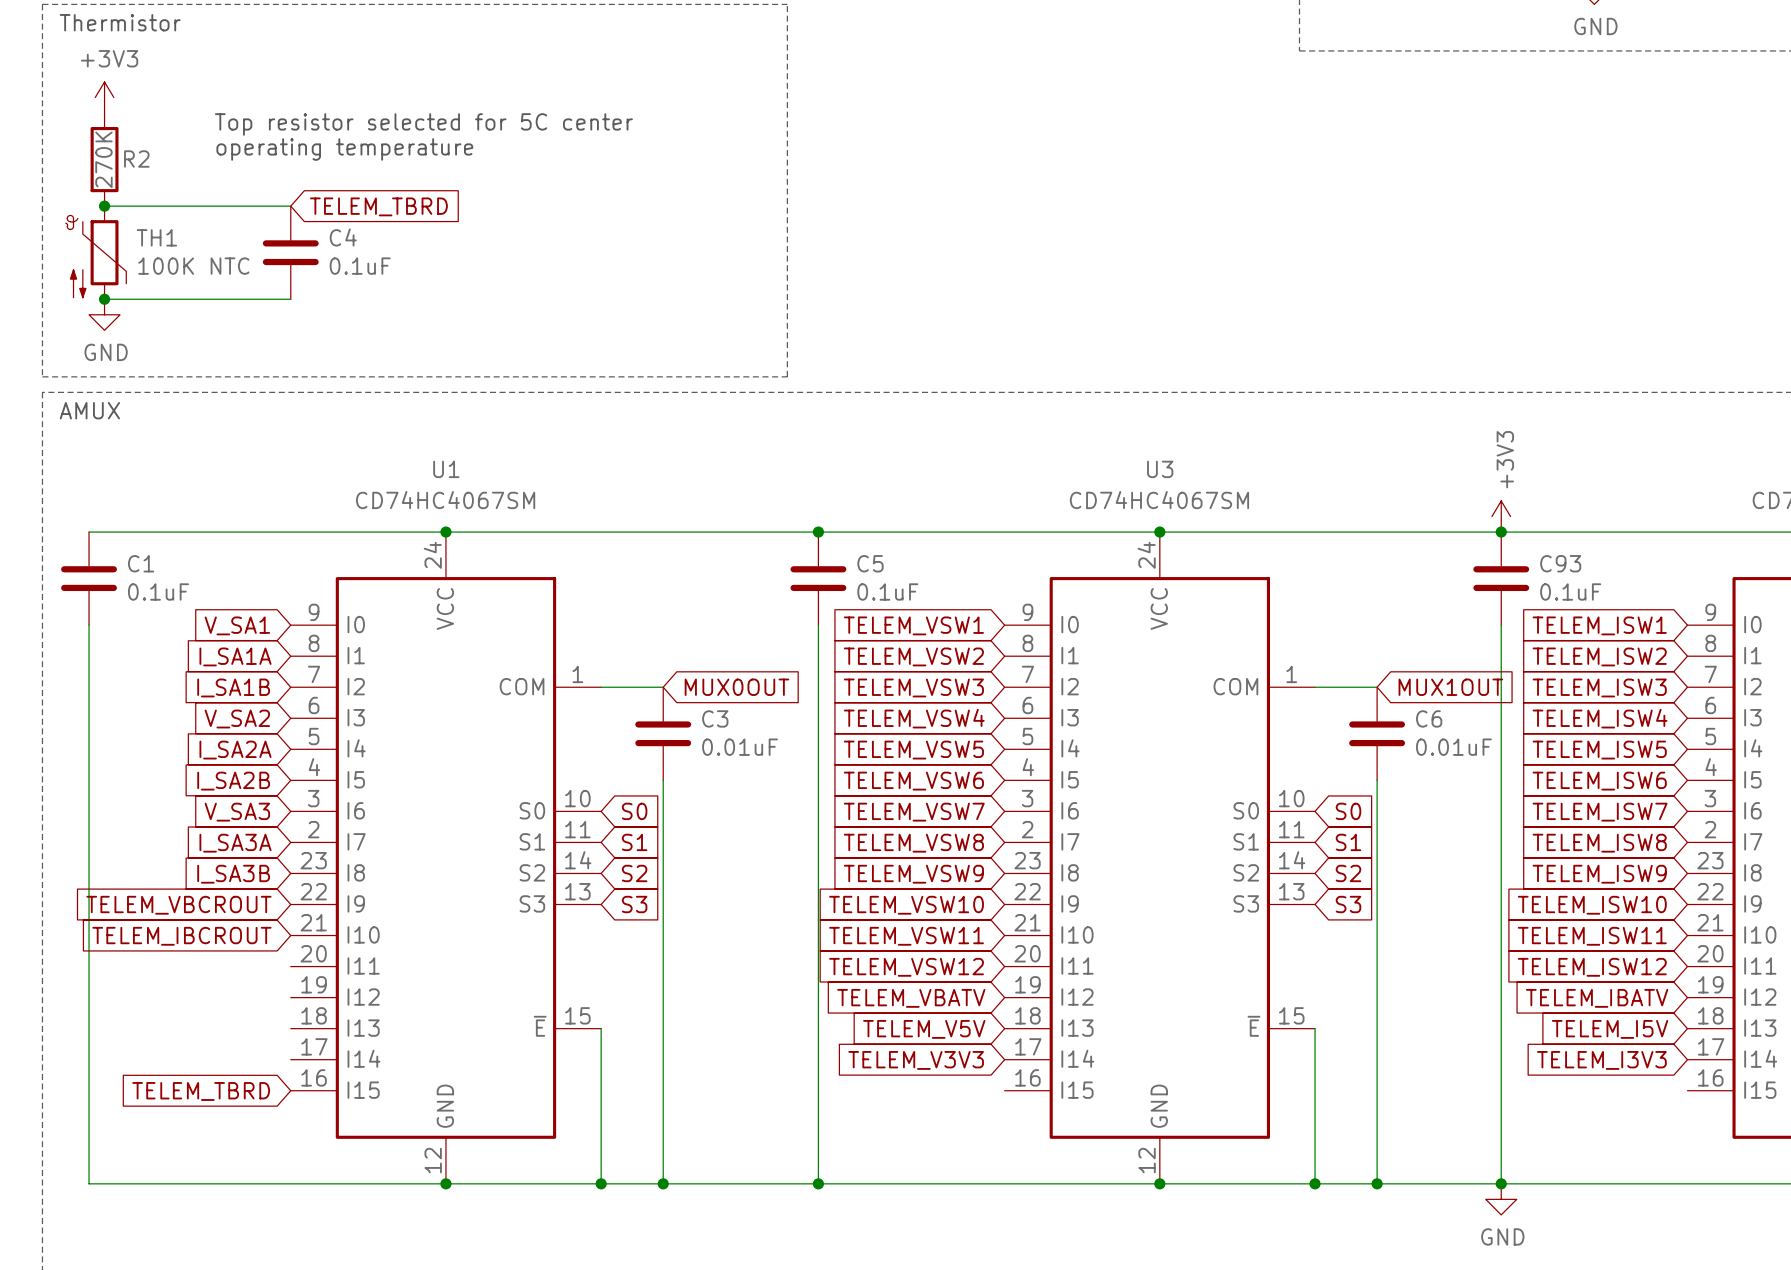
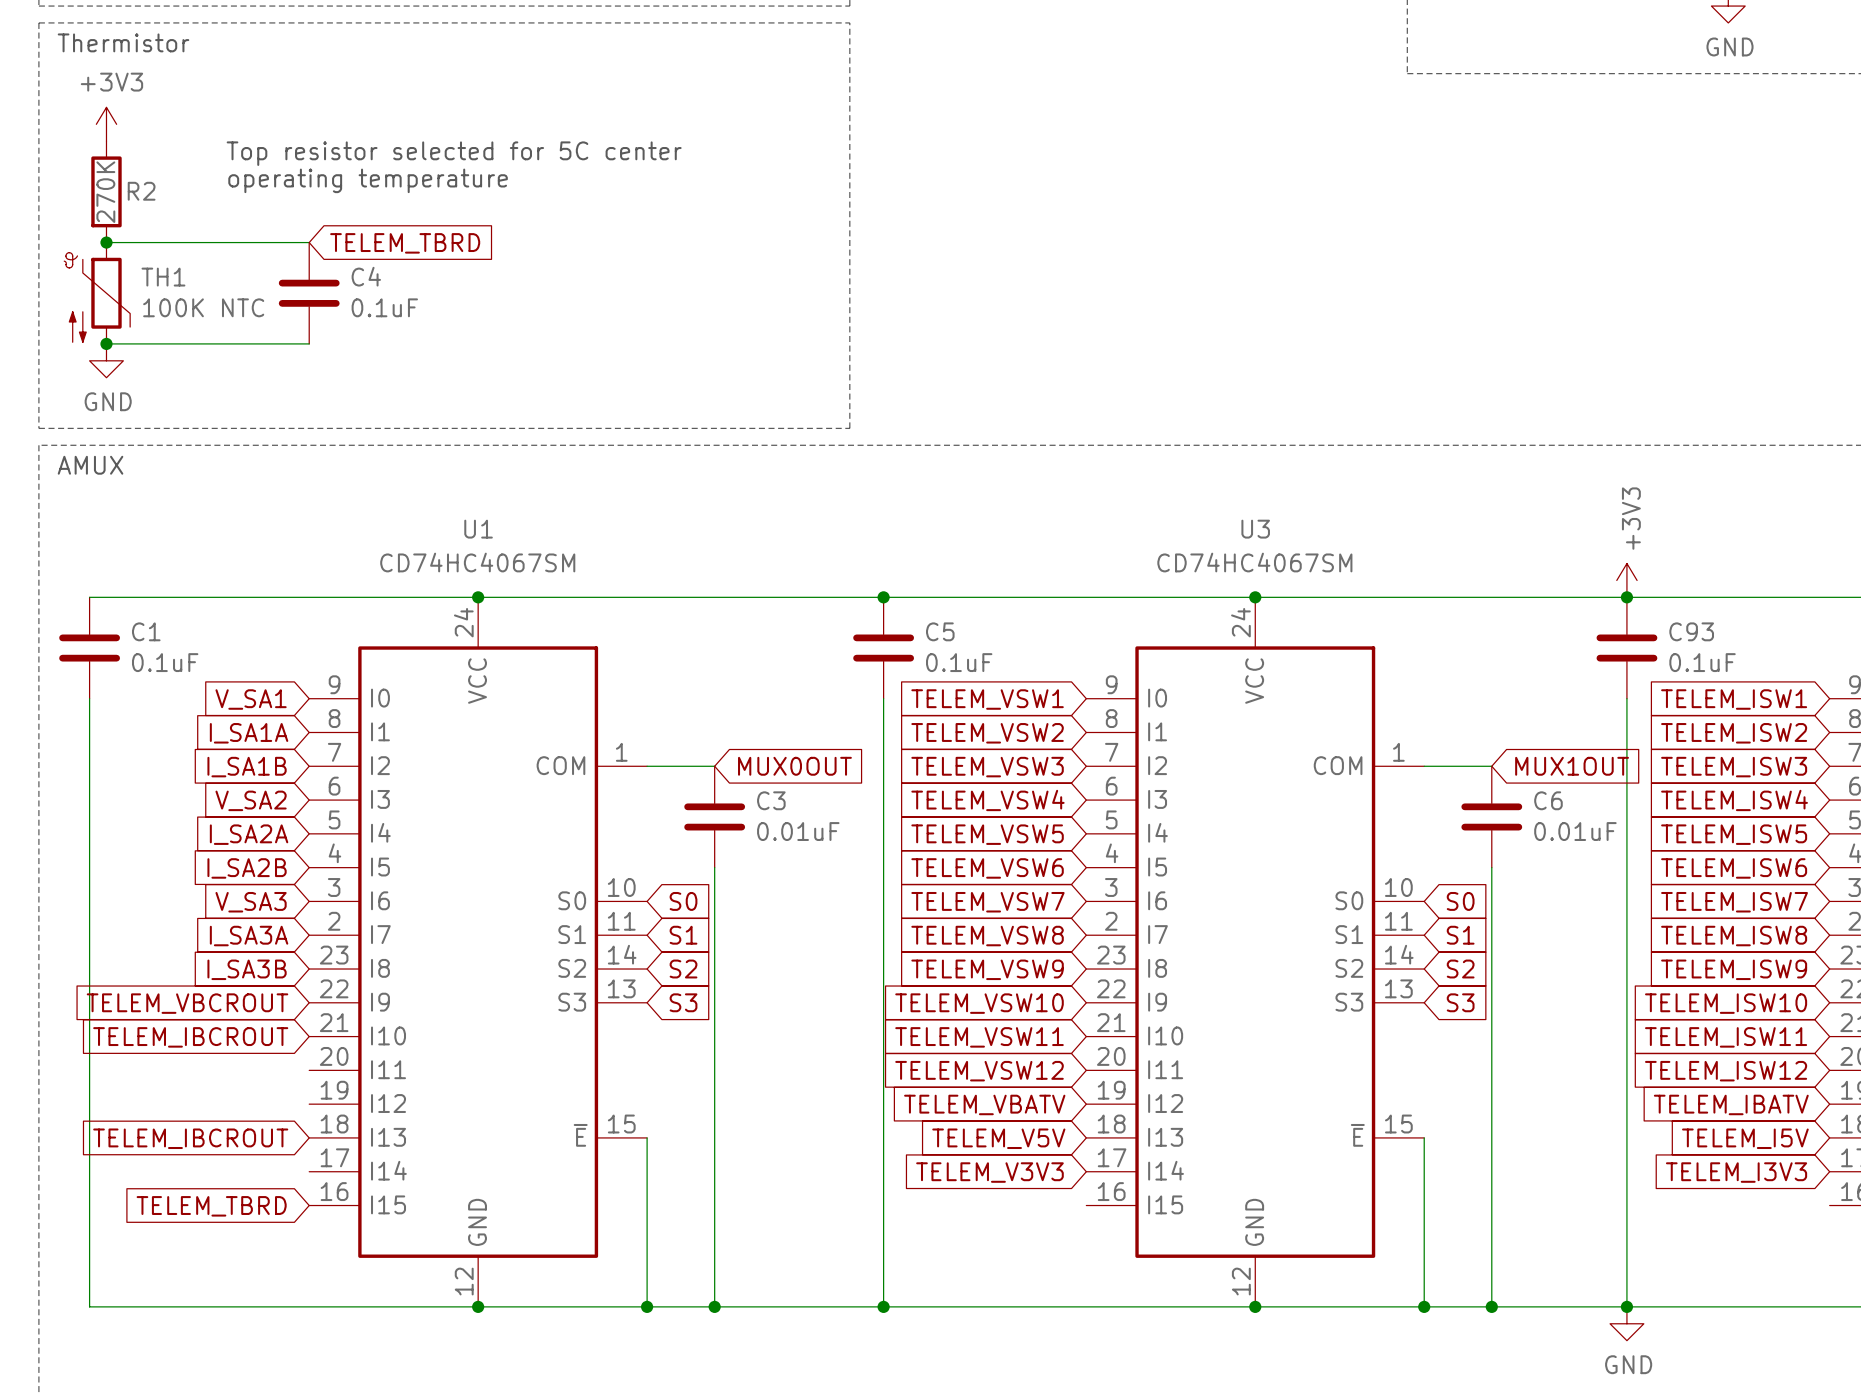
global label: none -> TELEM_IBCROUT (190, 1138)

